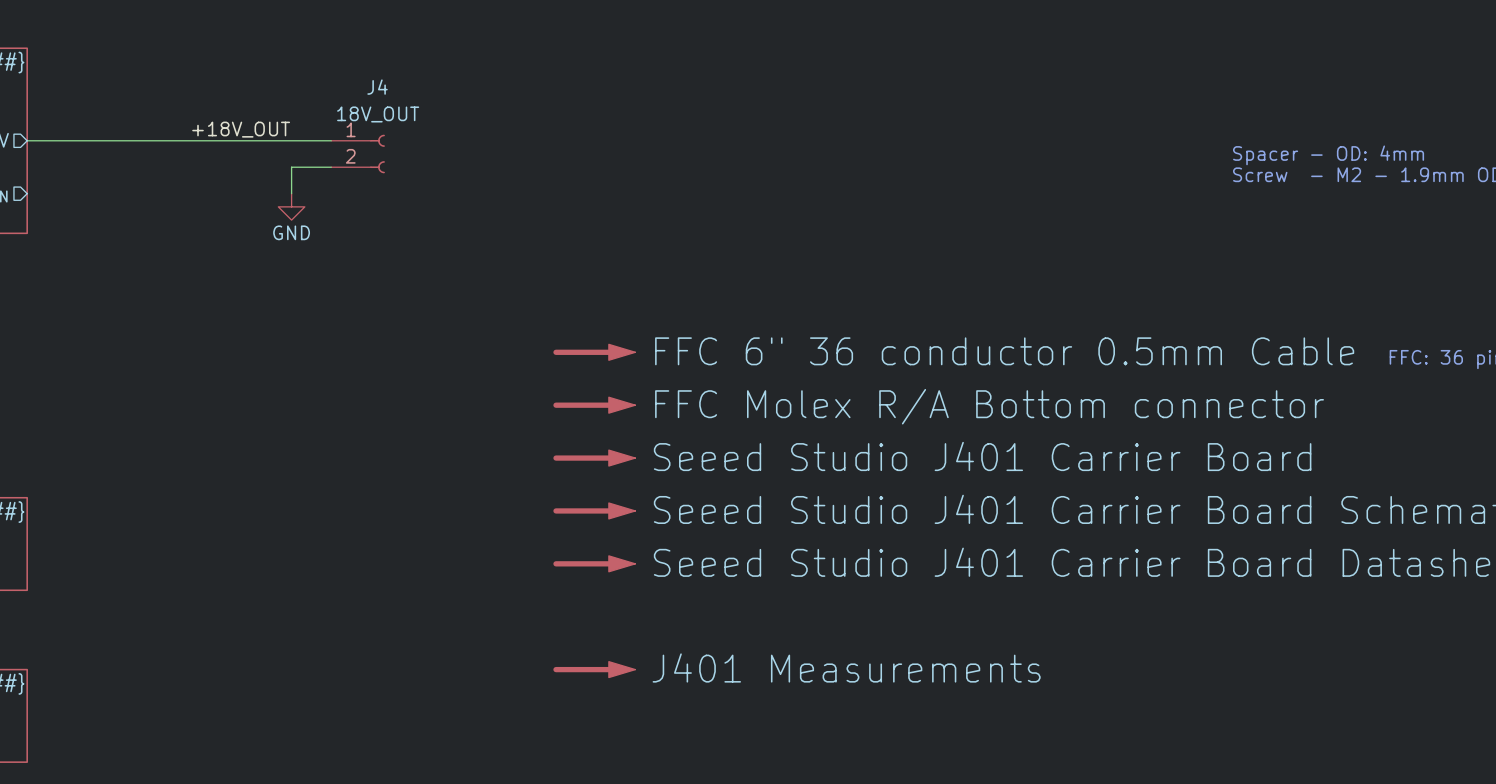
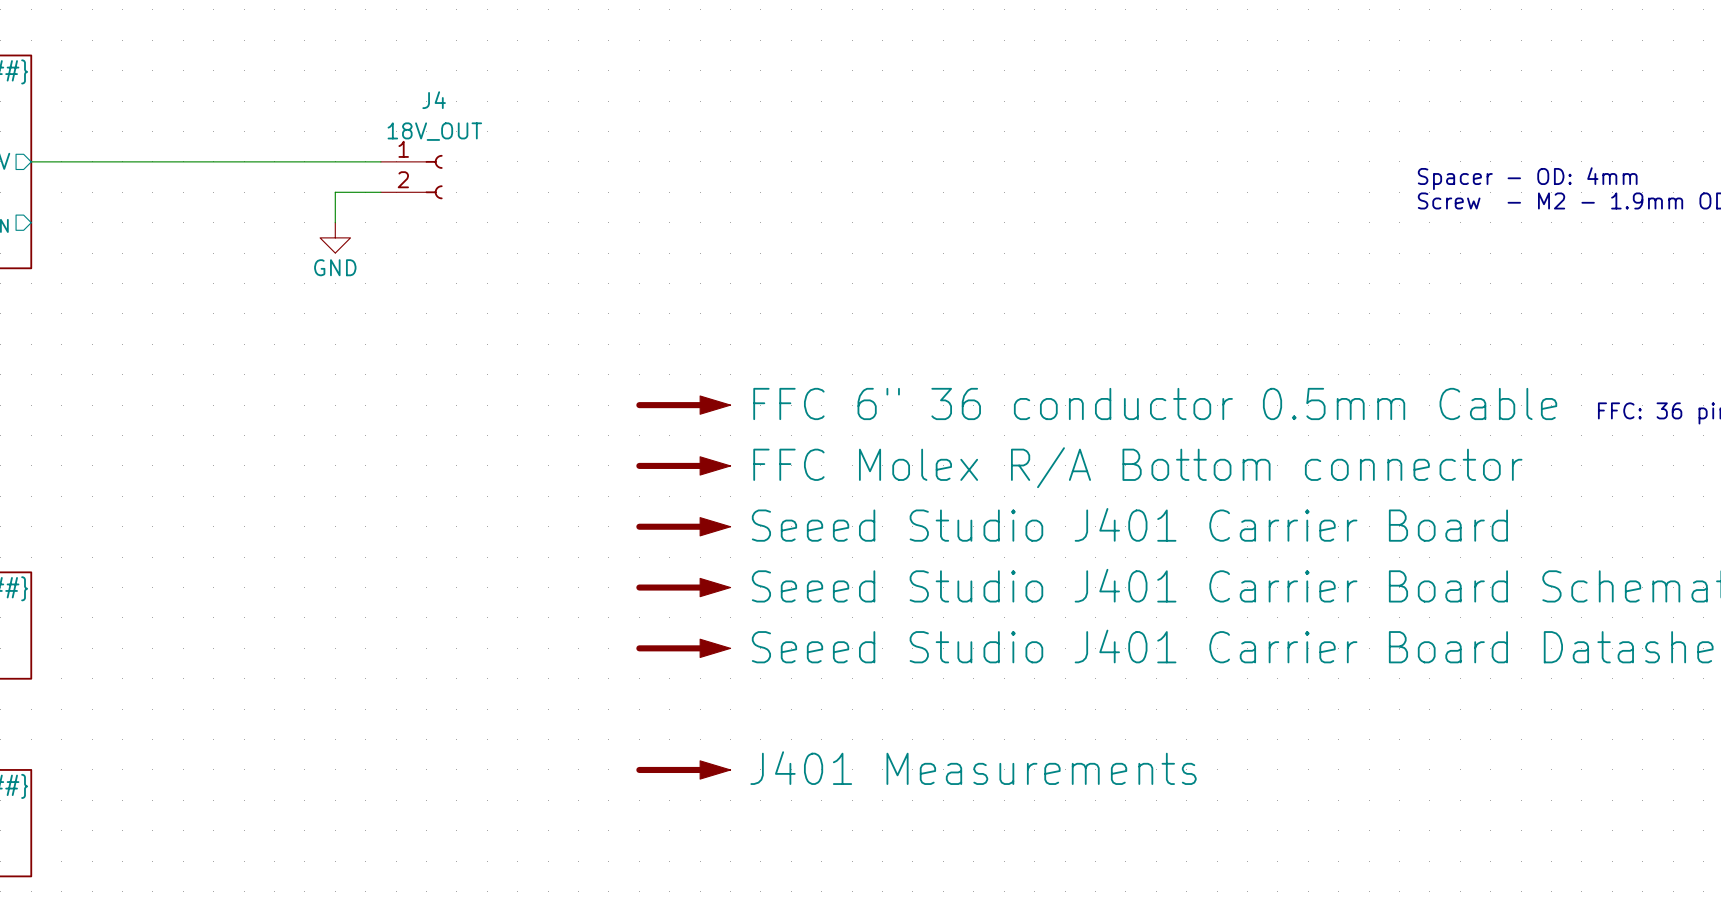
label: +18V_OUT (241, 129) -> none

